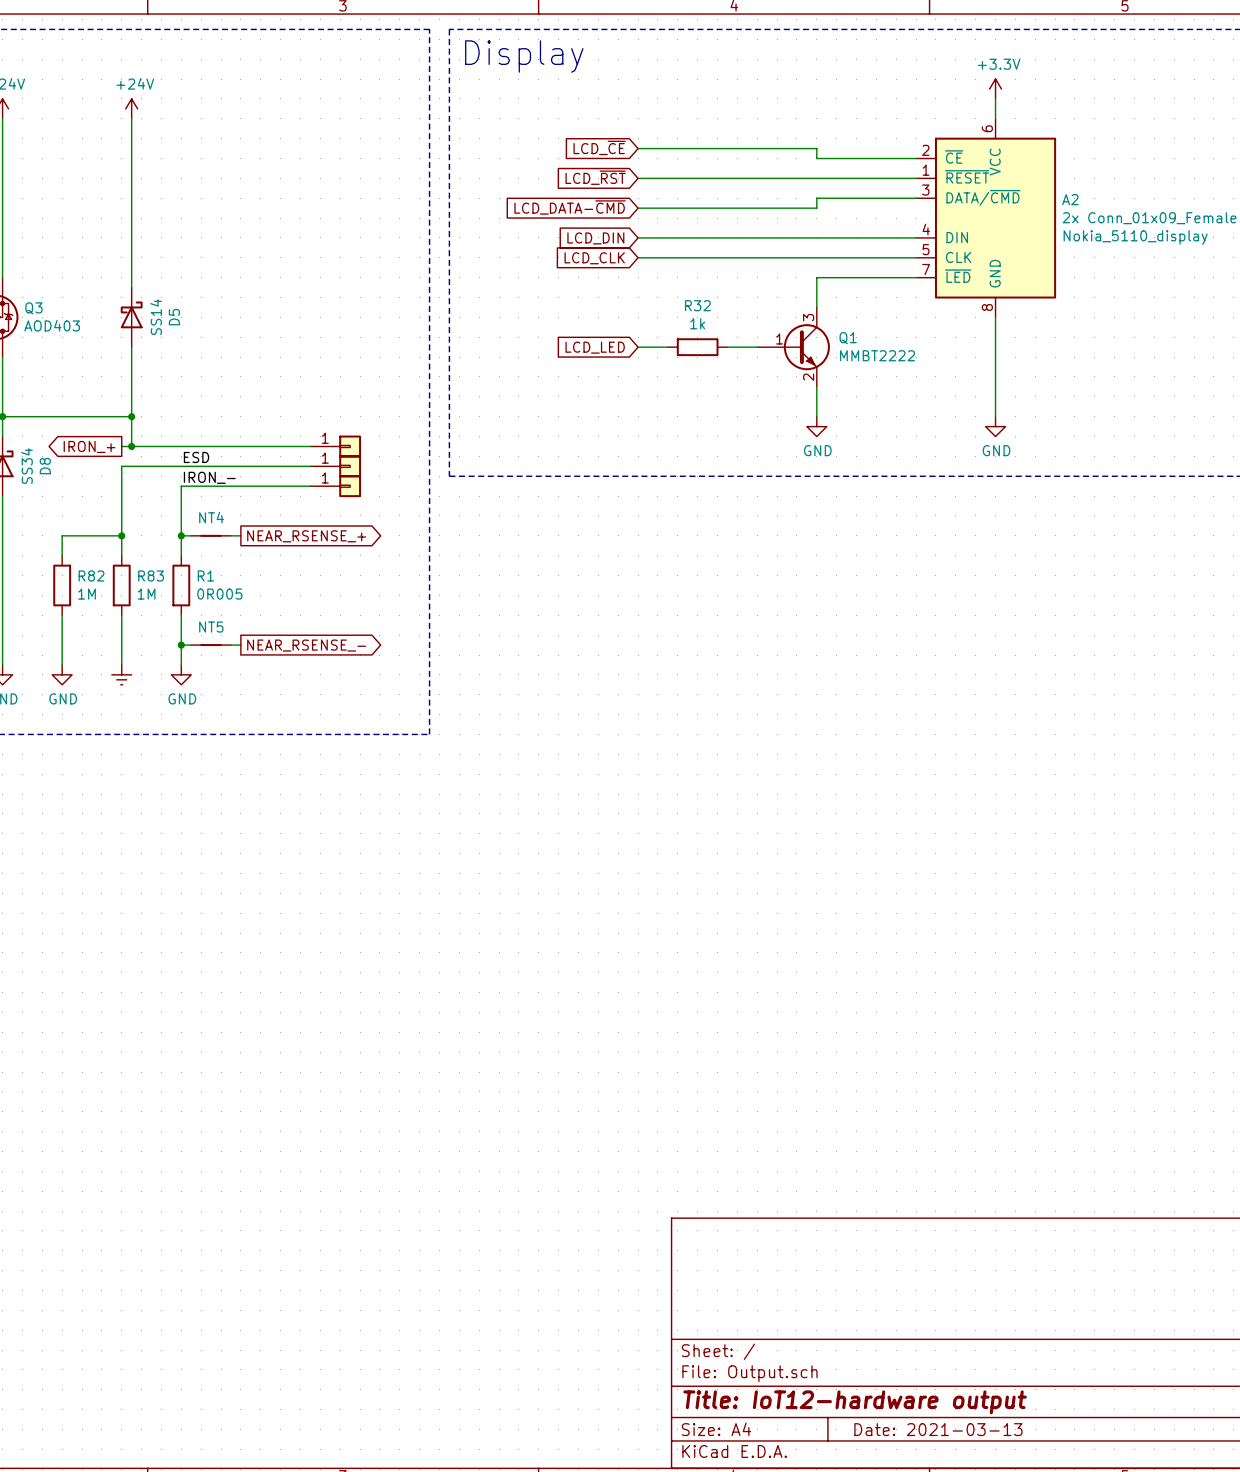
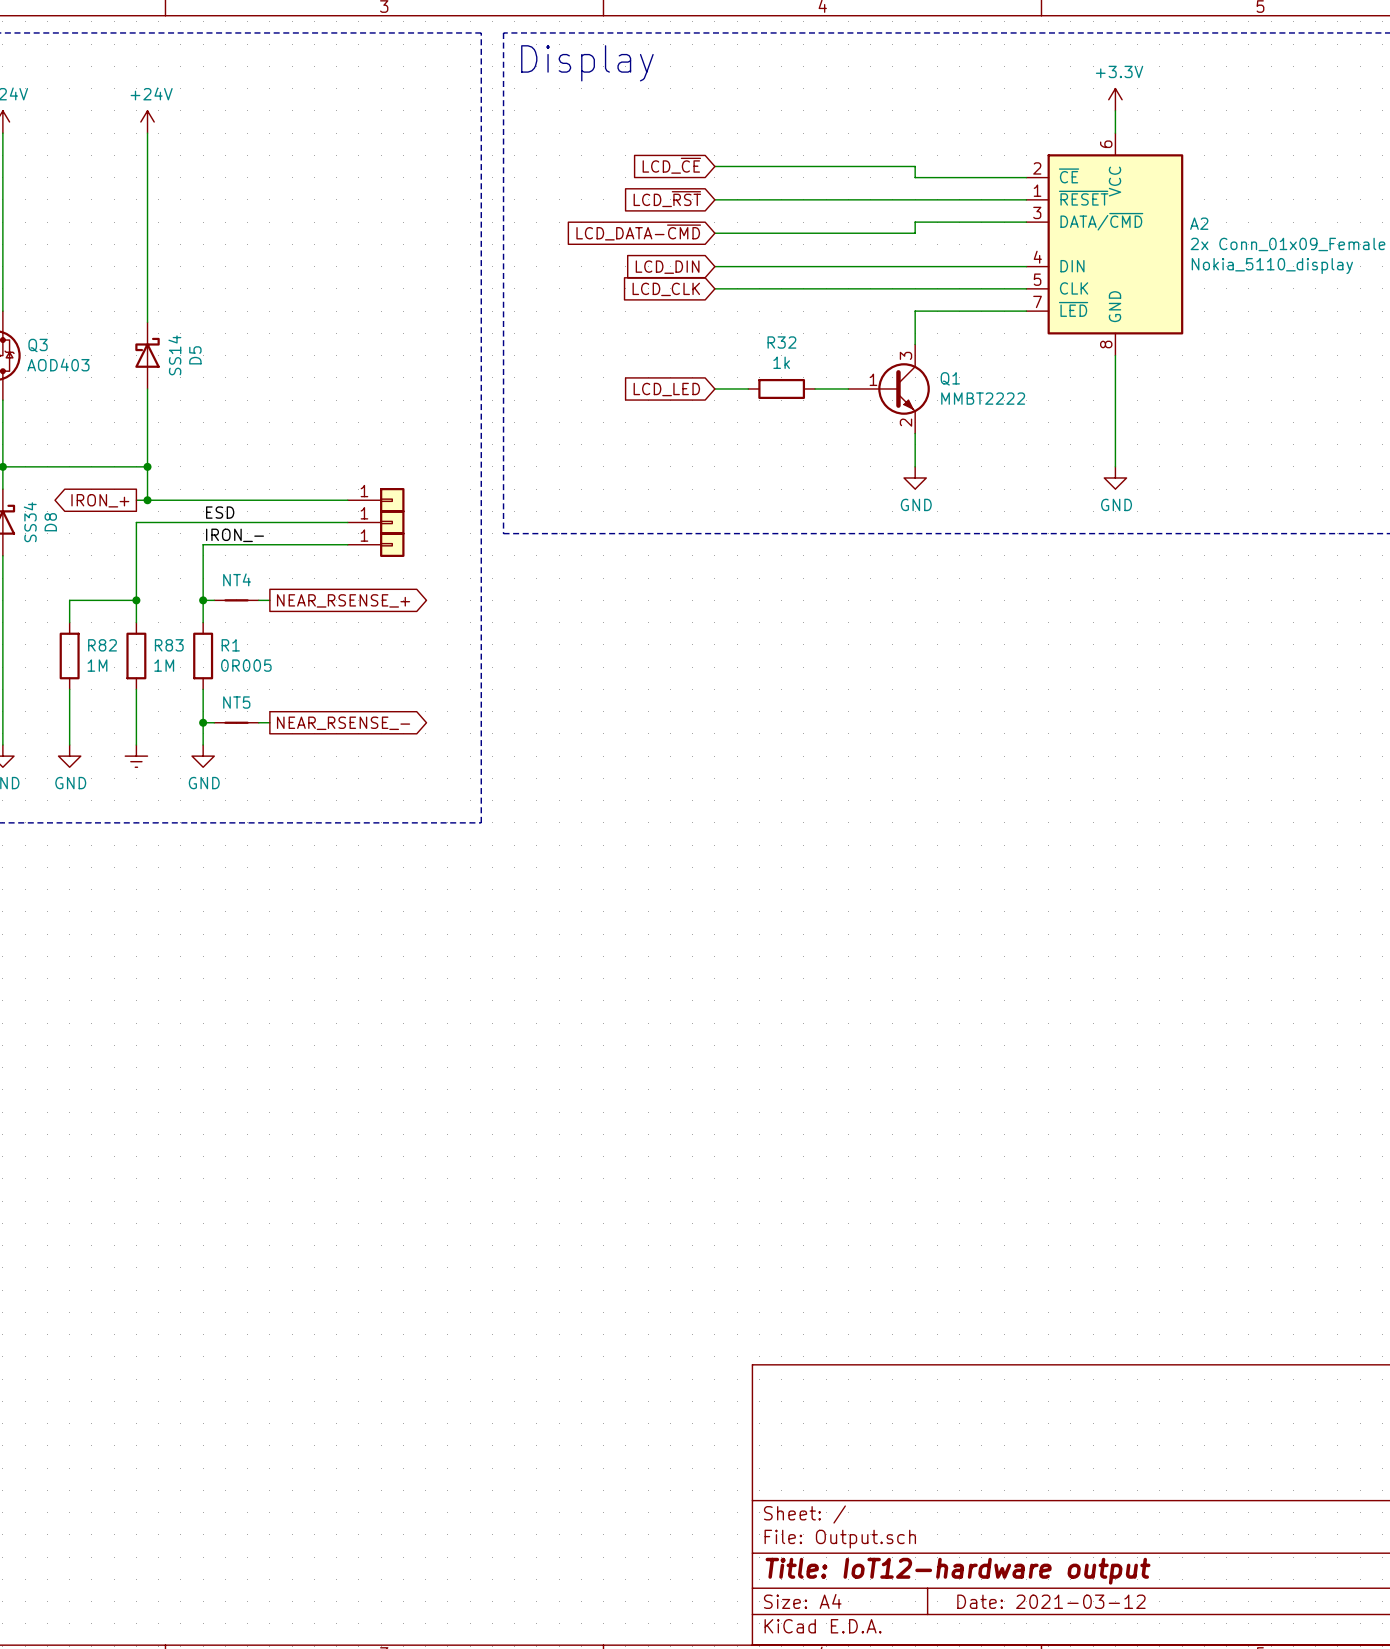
title block: Date: 2021-03-13 (938, 1429) -> Date: 2021-03-12 (1051, 1601)

